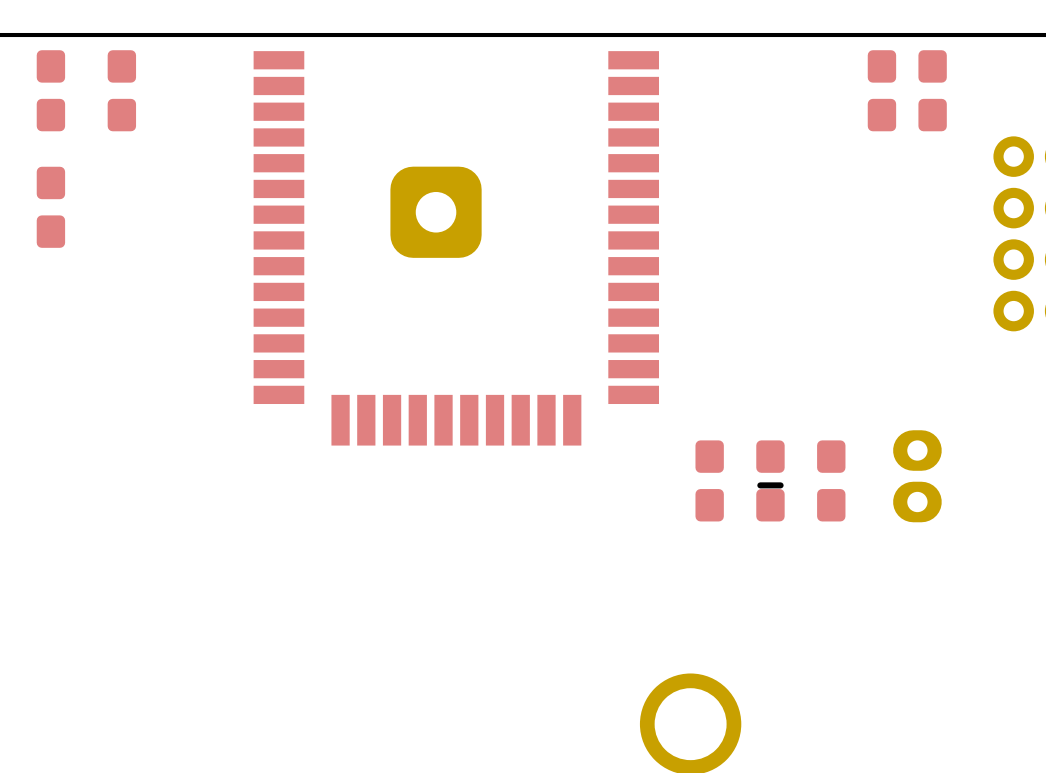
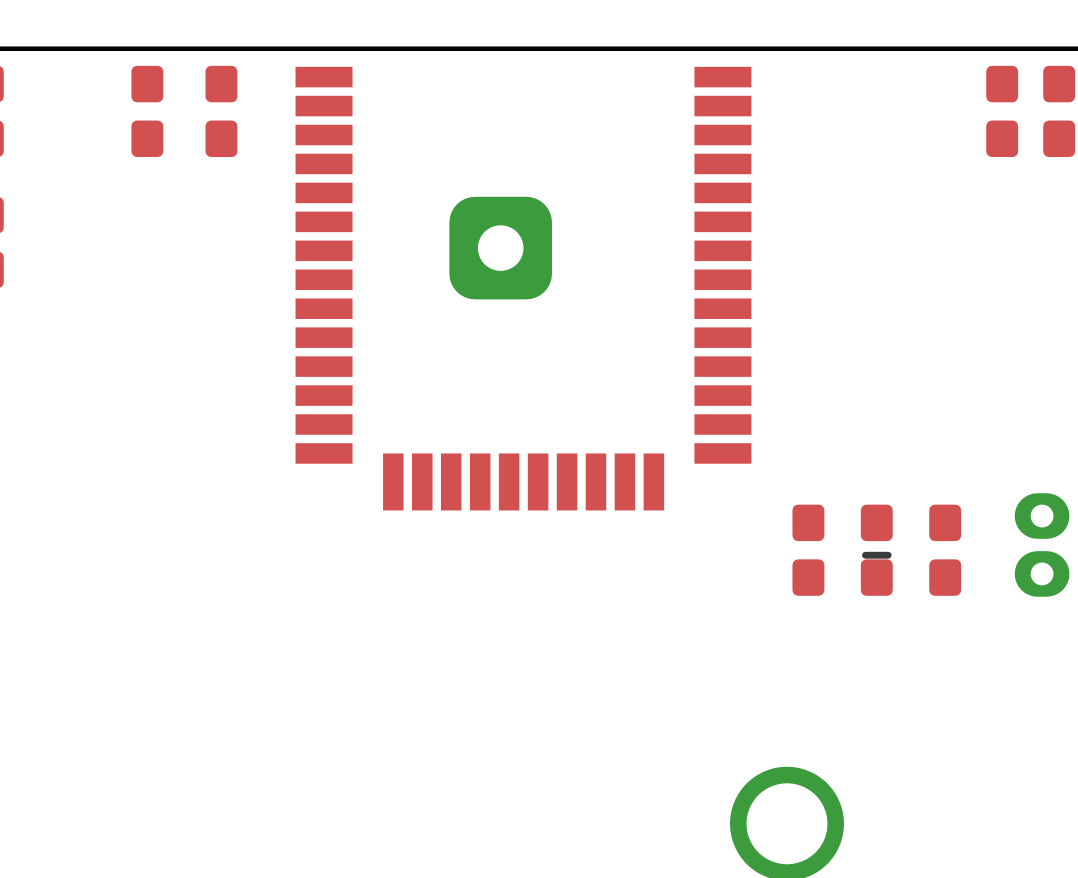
part: (50, 90) -> none
part: none -> (221, 111)
part: (50, 207) -> none

